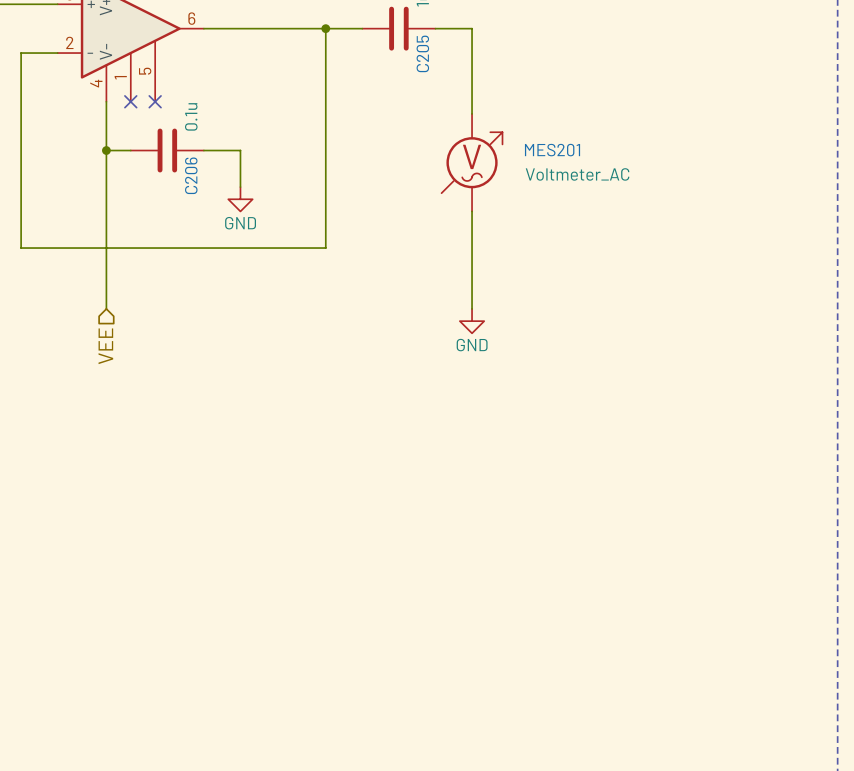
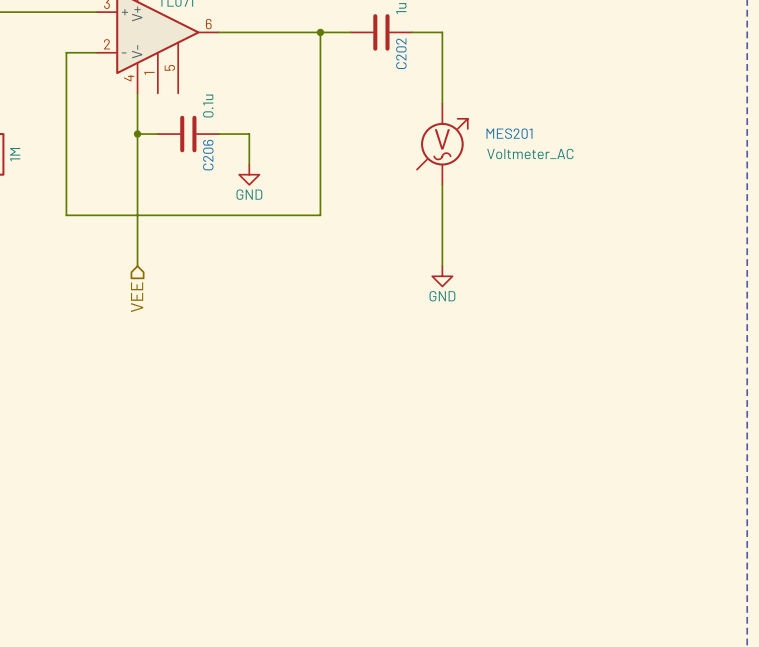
C205 name: C205 (422, 53) -> C202 (401, 53)
no-connect mark: (130, 101) -> none
no-connect mark: (155, 101) -> none

